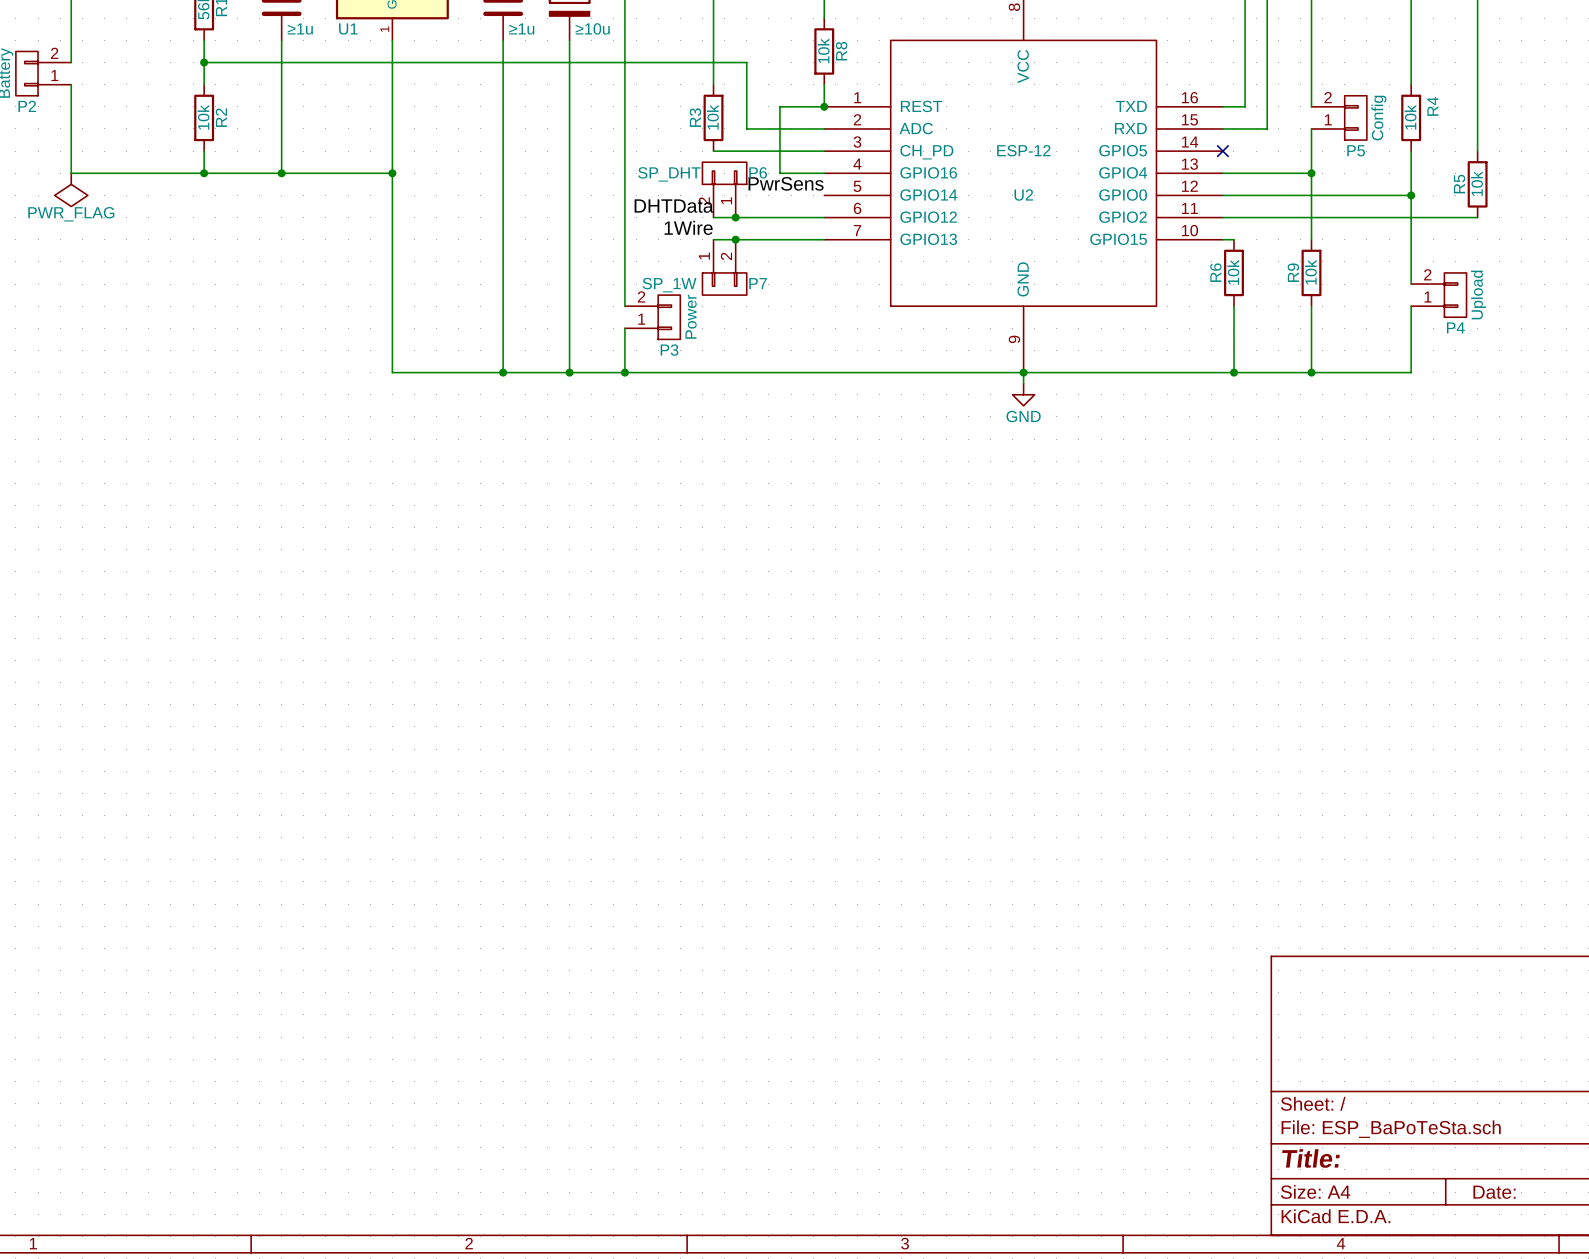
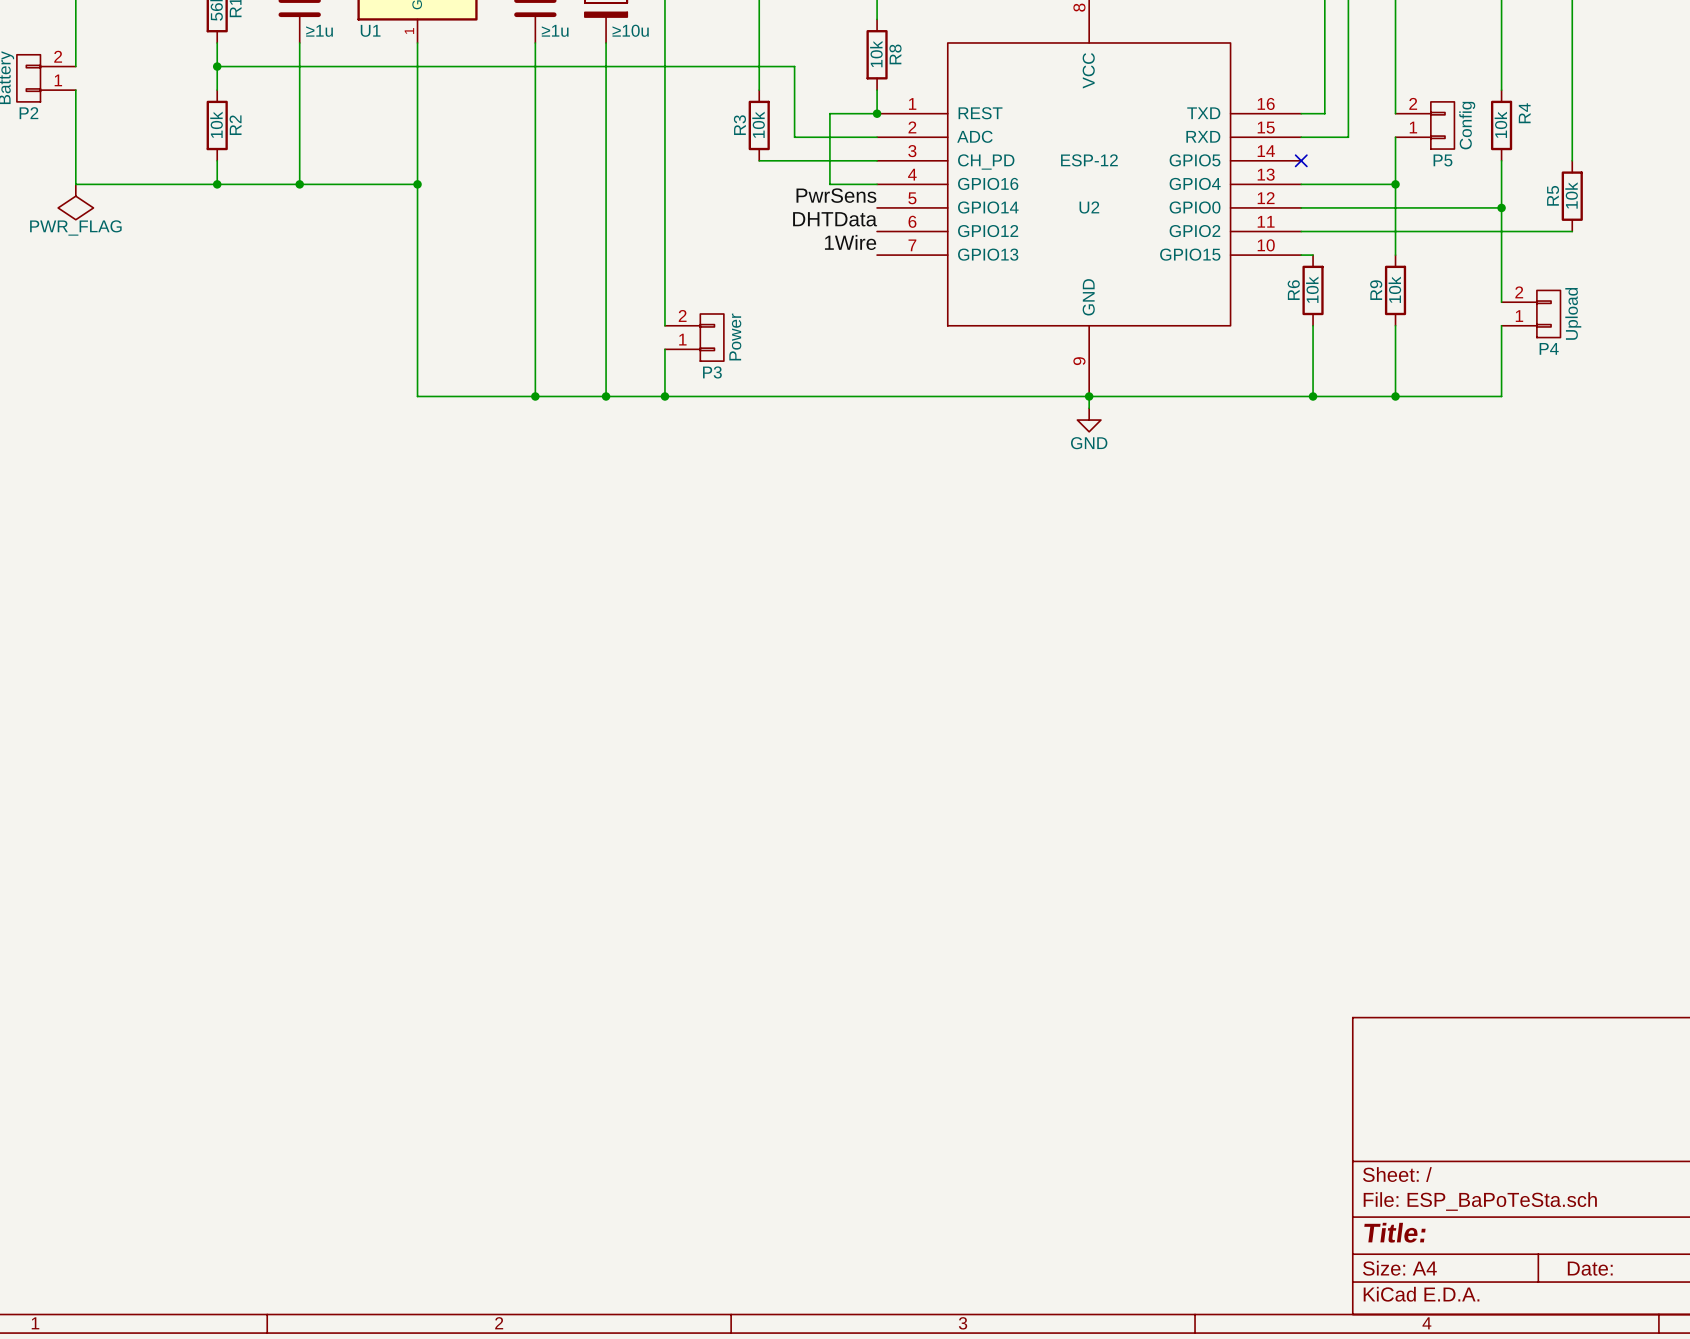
P6: SP_DHT (724, 189) -> none
label position: DHTData (674, 206) -> DHTData (835, 219)
wire: (713, 217) (824, 217) -> none
junction: (735, 217) -> none
label position: 1Wire (688, 227) -> 1Wire (850, 242)
wire: (713, 239) (824, 239) -> none
junction: (735, 239) -> none
P7: SP_1W (724, 267) -> none

